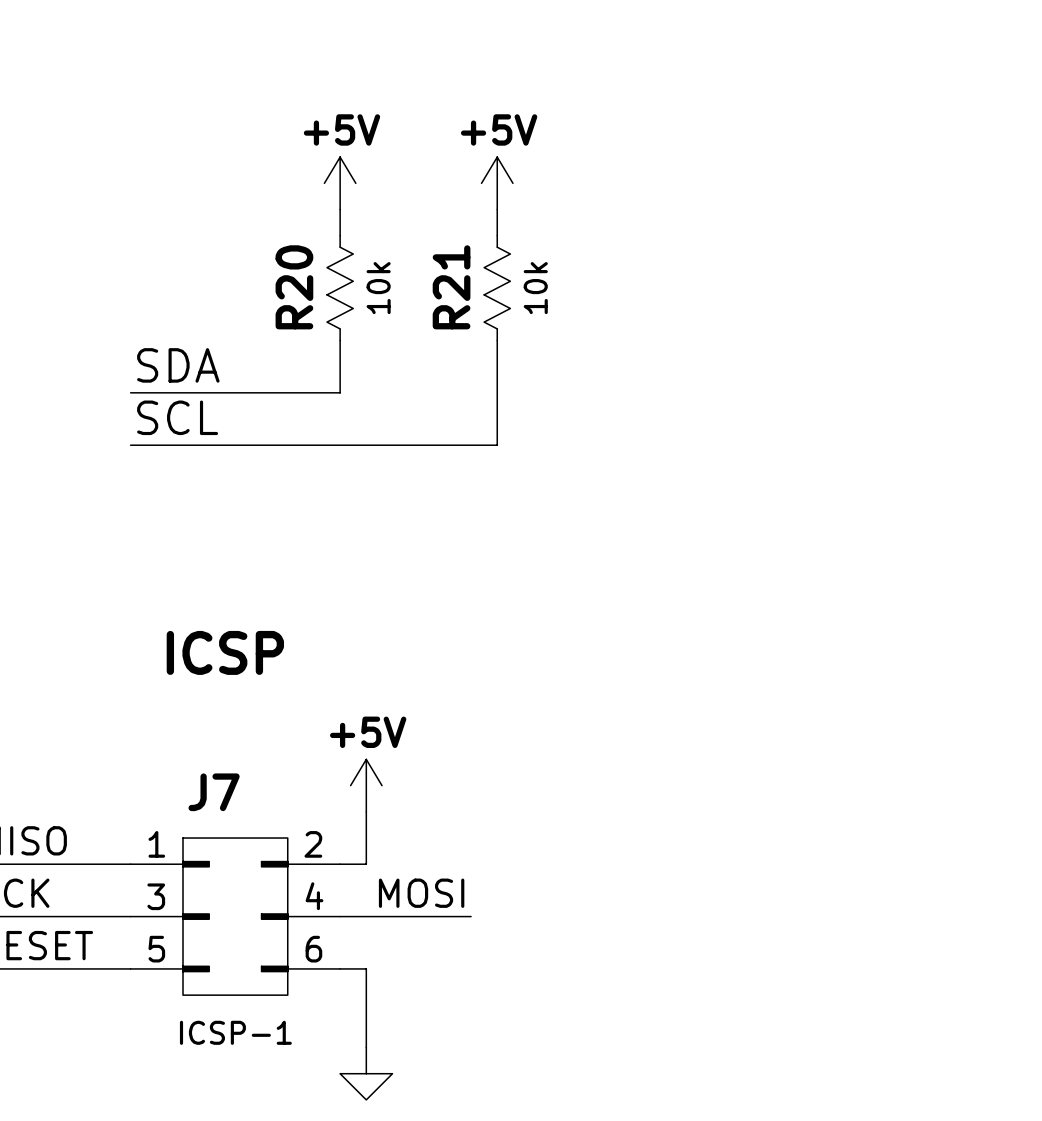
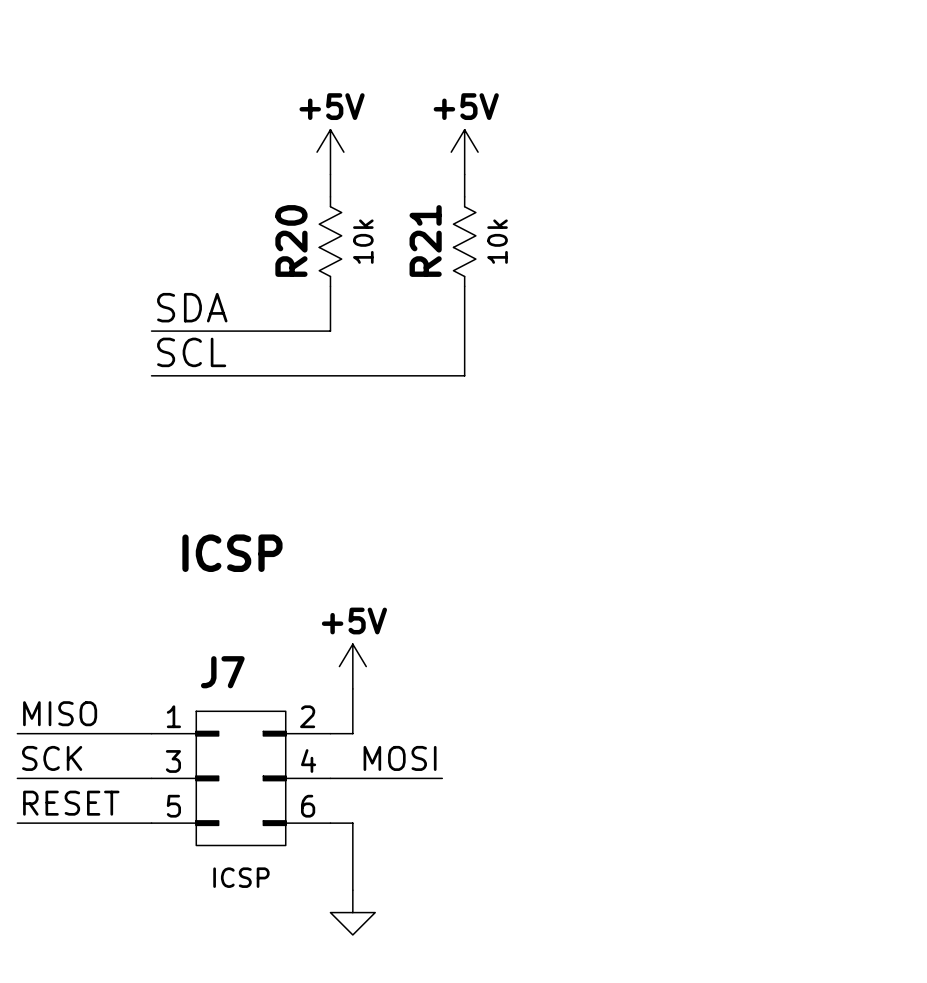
J7 value: ICSP-1 (235, 1032) -> ICSP (241, 877)

